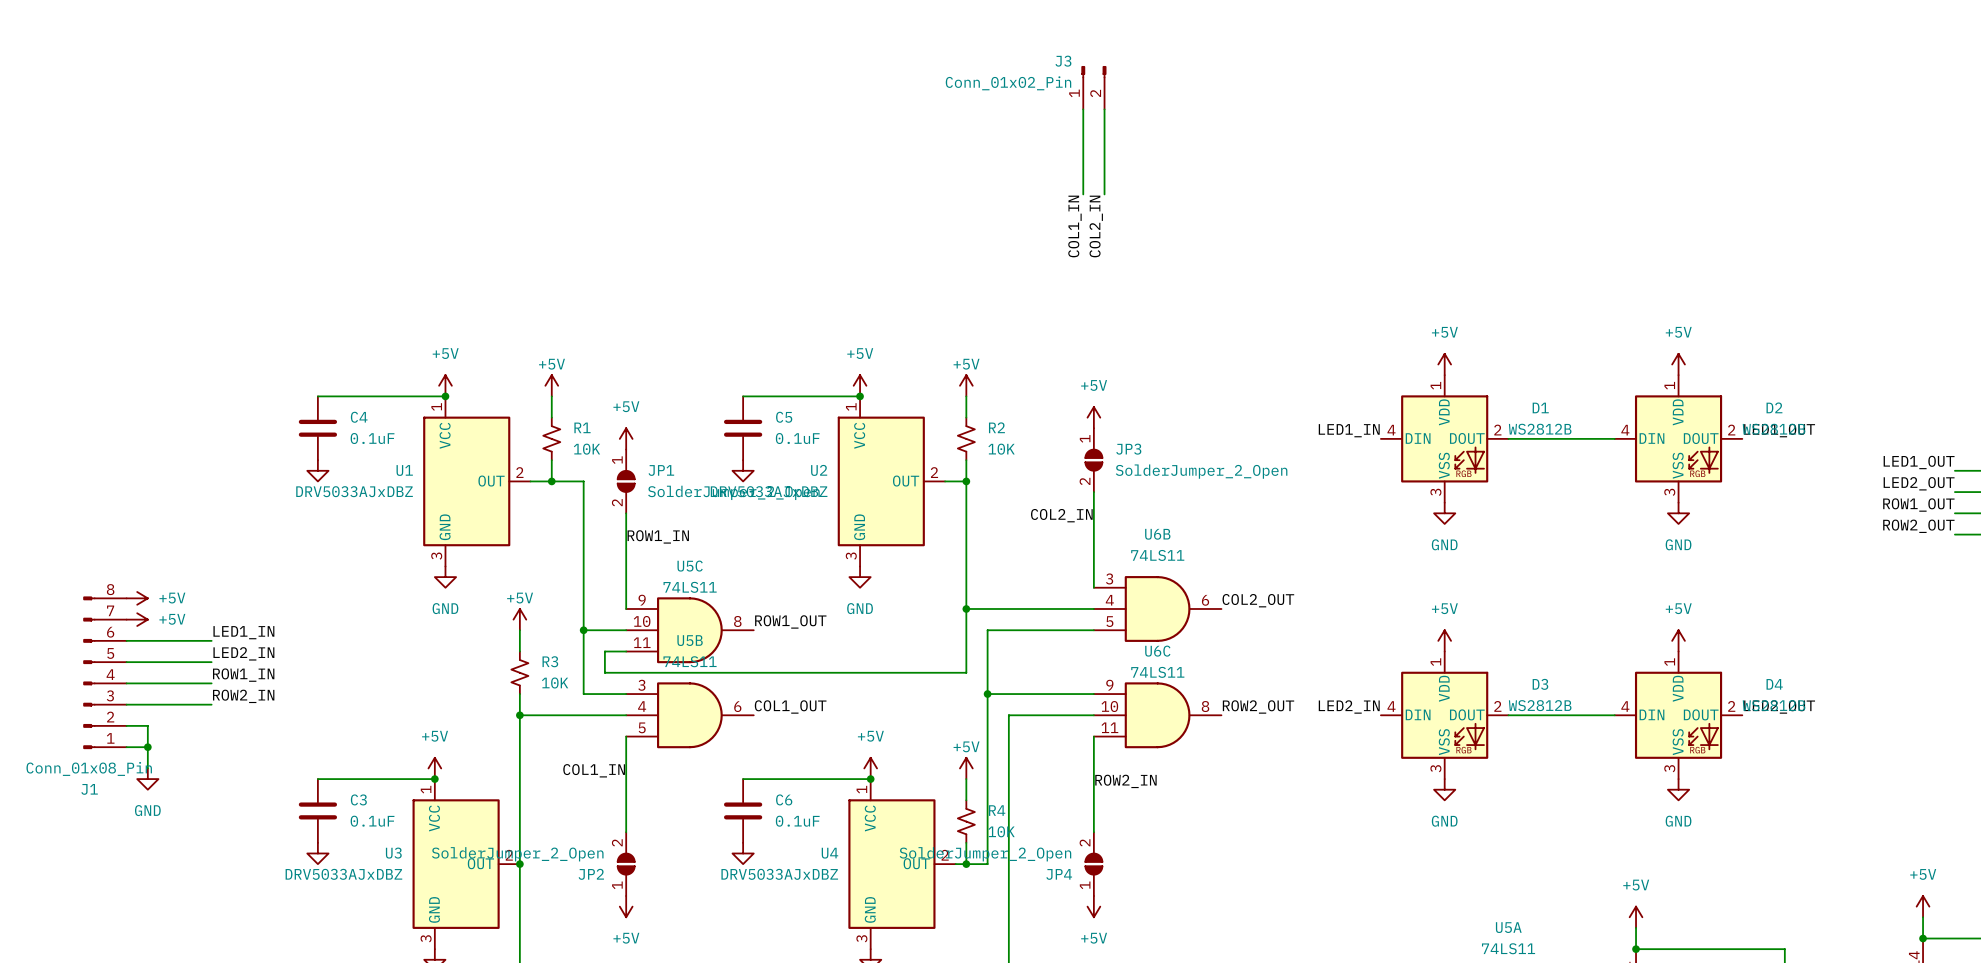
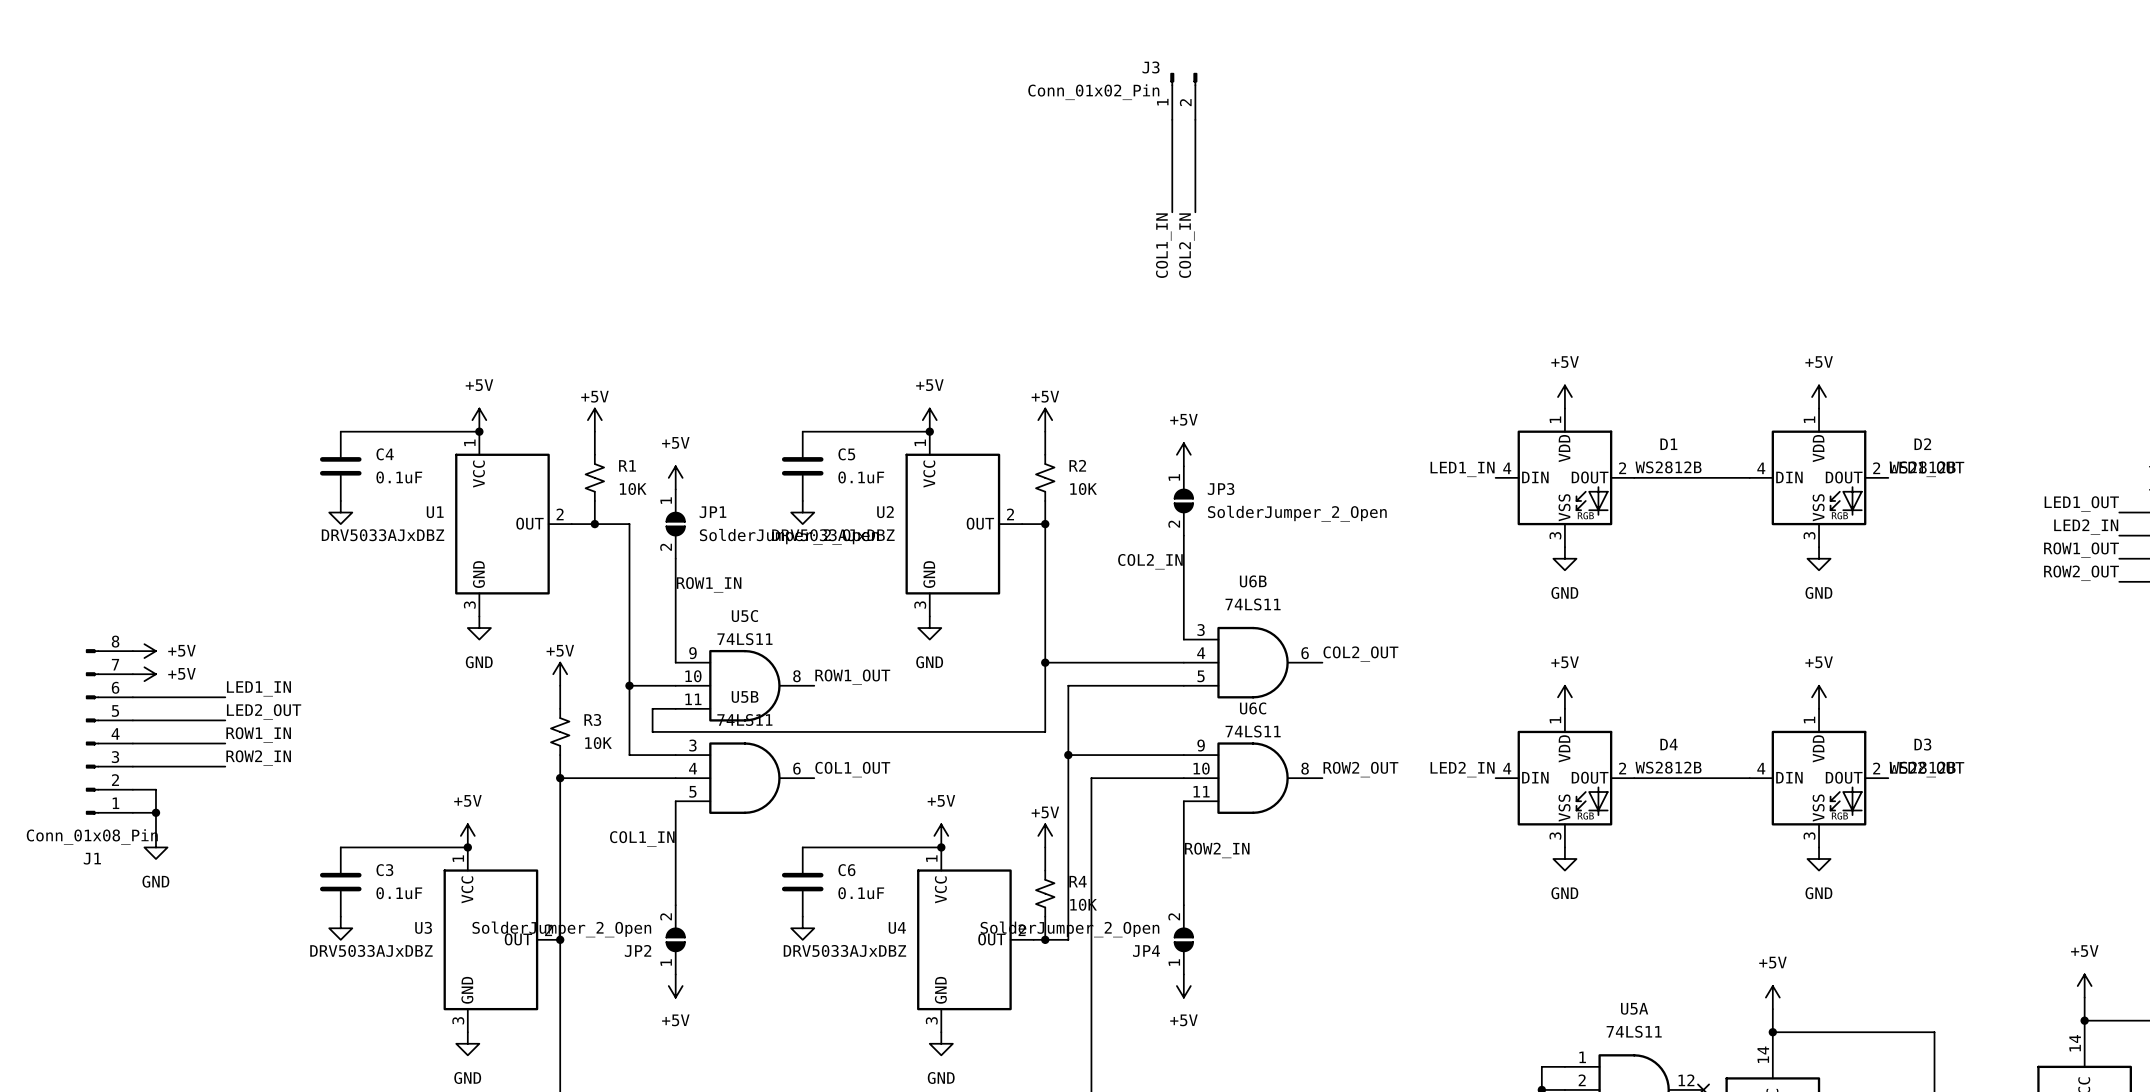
label: LED2_OUT (1919, 483) -> LED2_IN (2086, 527)
label: LED2_IN (243, 653) -> LED2_OUT (264, 711)
D3 name: D3 (1540, 684) -> D4 (1669, 744)
D4 name: D4 (1774, 684) -> D3 (1922, 744)

